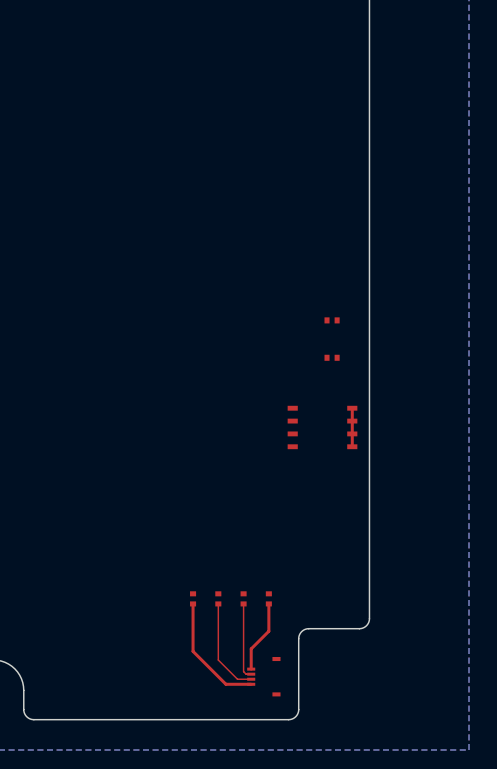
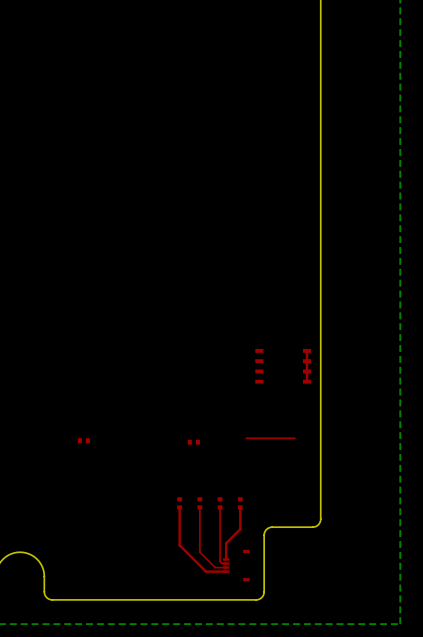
part: (332, 320) -> none
part: (332, 357) -> none
top track: none -> (294, 438) (246, 438)
part: none -> (83, 440)
part: none -> (193, 442)

